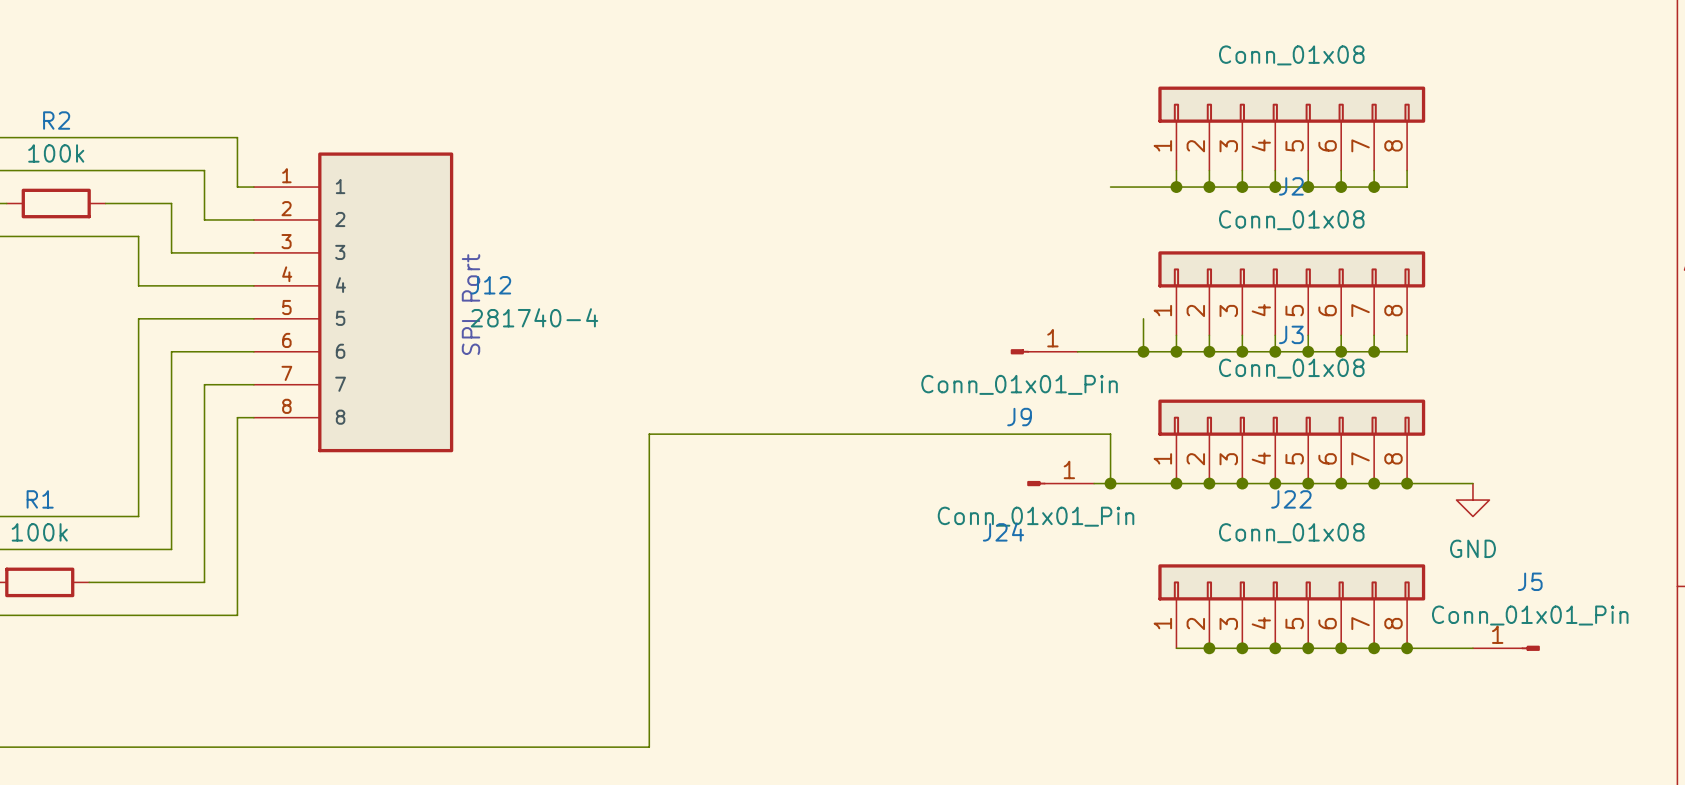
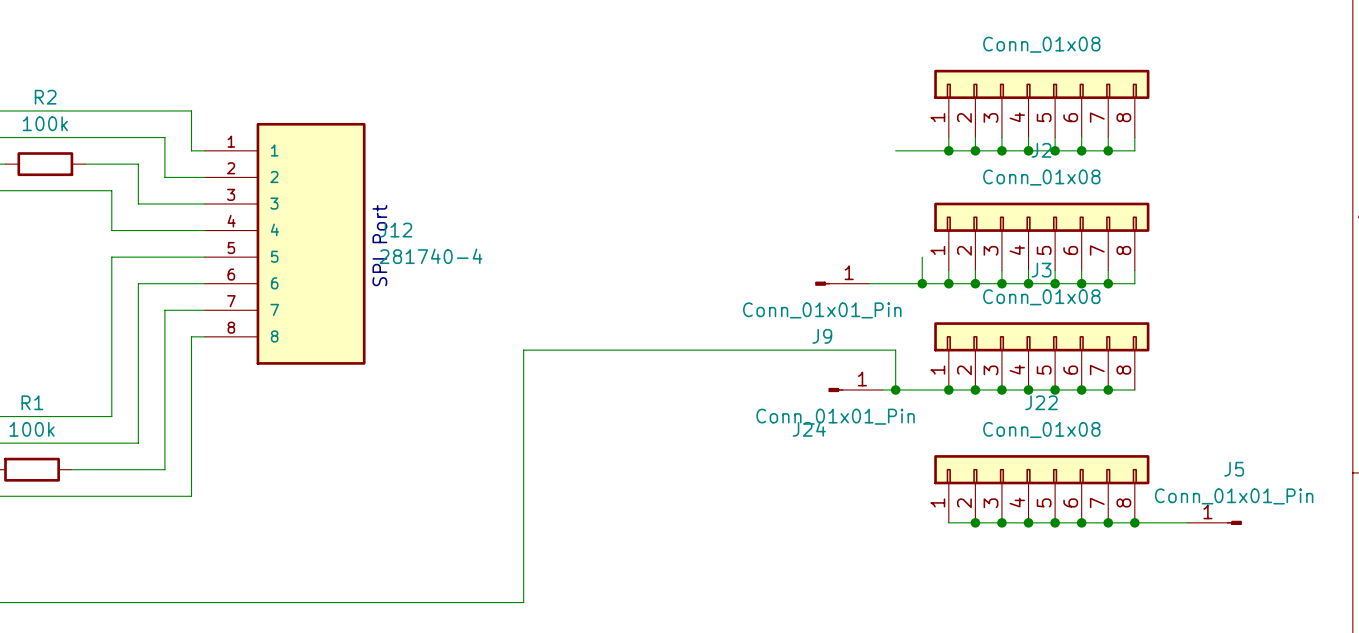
wire: (1407, 483) (1472, 483) -> none
junction: (1407, 483) -> none
power symbol: GND (1472, 500) -> none

